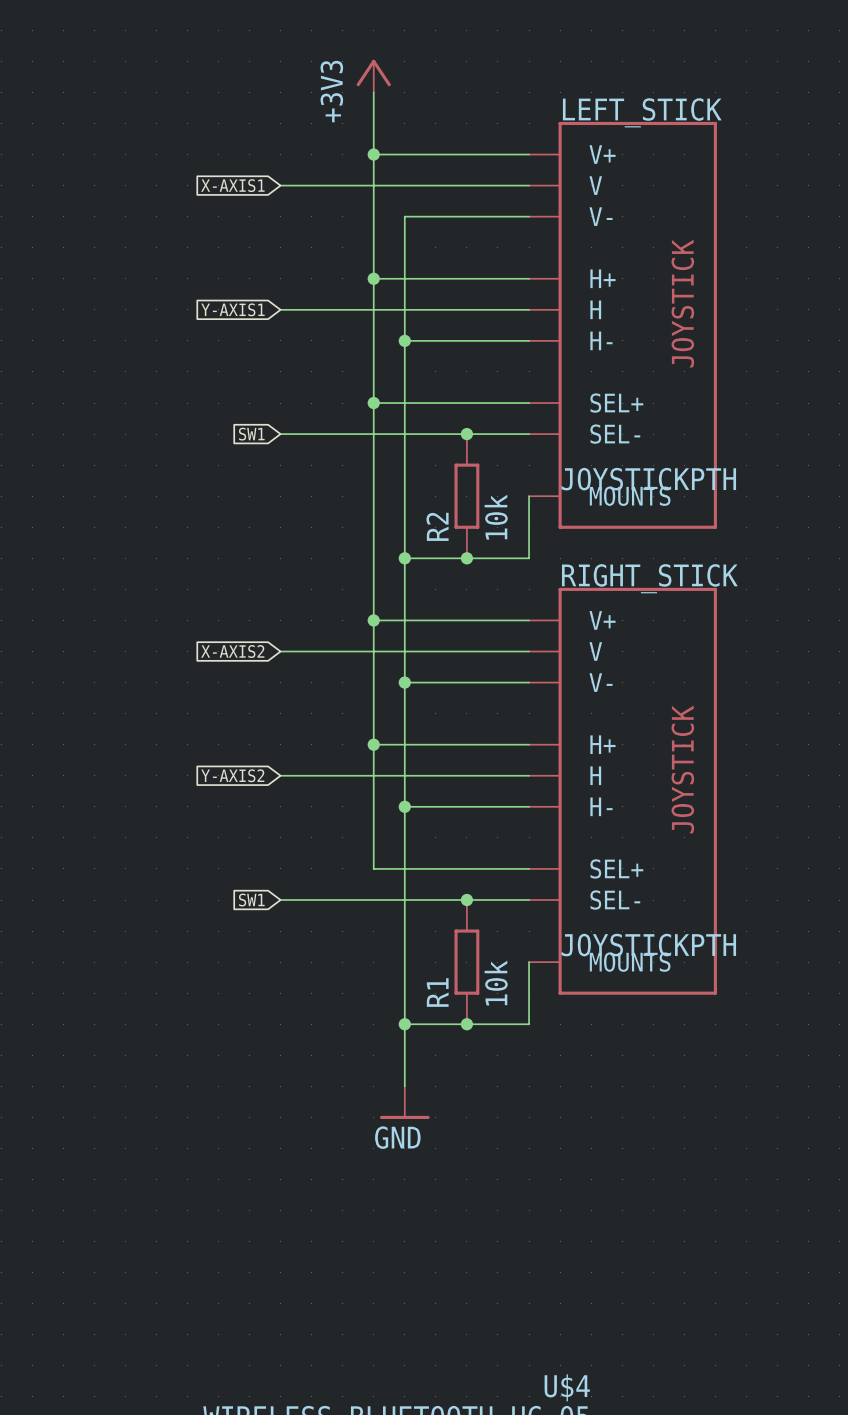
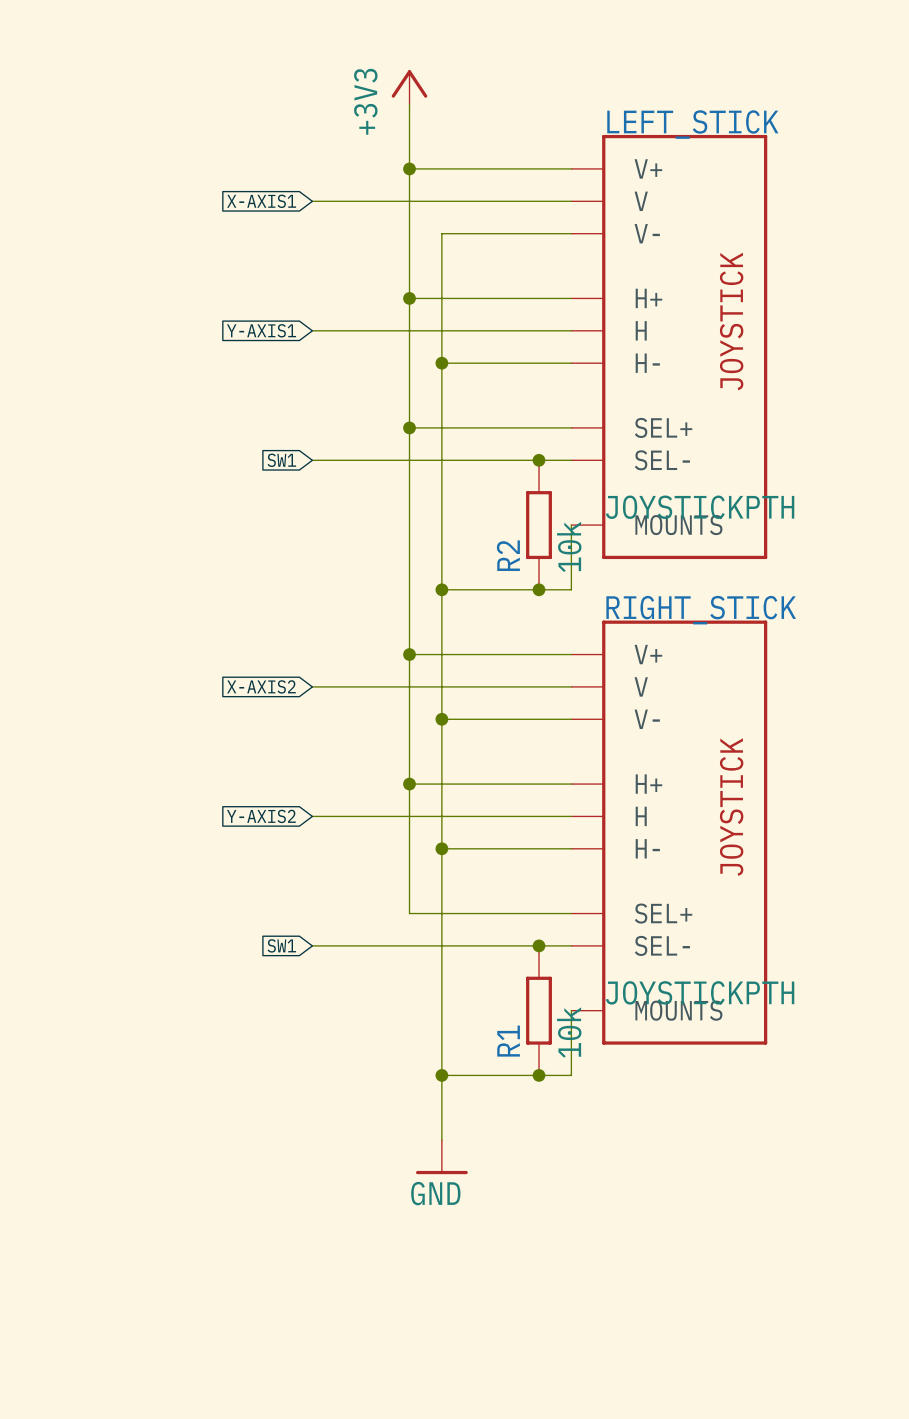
junction position: (466, 434) -> (539, 460)
R2 position: (466, 496) -> (539, 525)
junction position: (466, 558) -> (539, 589)
junction position: (466, 900) -> (539, 945)
R1 position: (466, 962) -> (539, 1010)
junction position: (466, 1024) -> (539, 1075)

